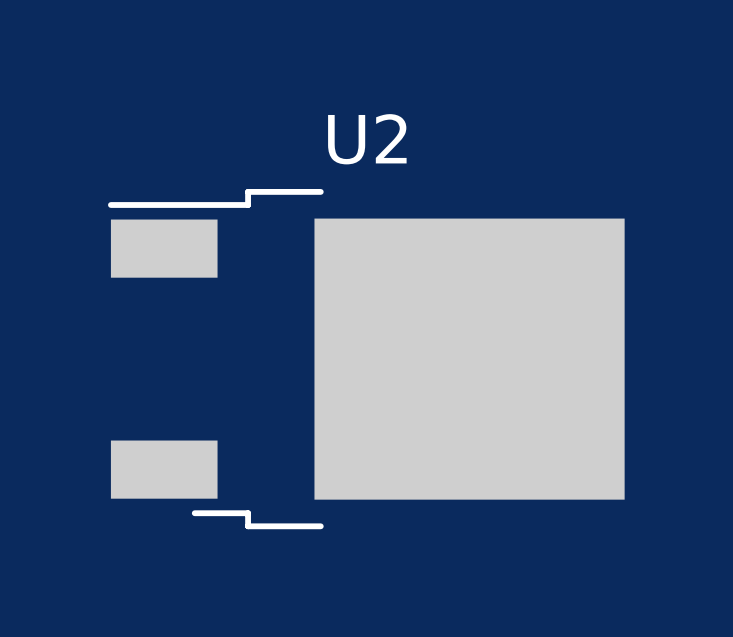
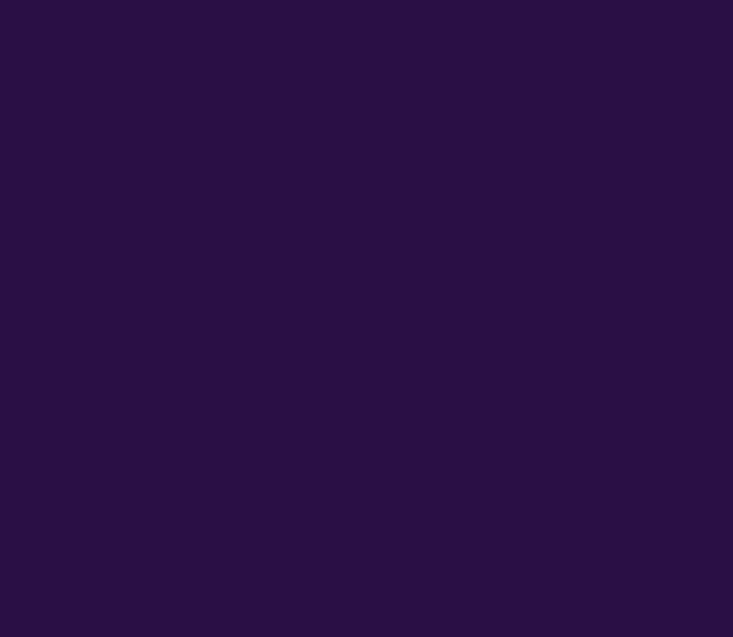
U2: (366, 359) -> none

